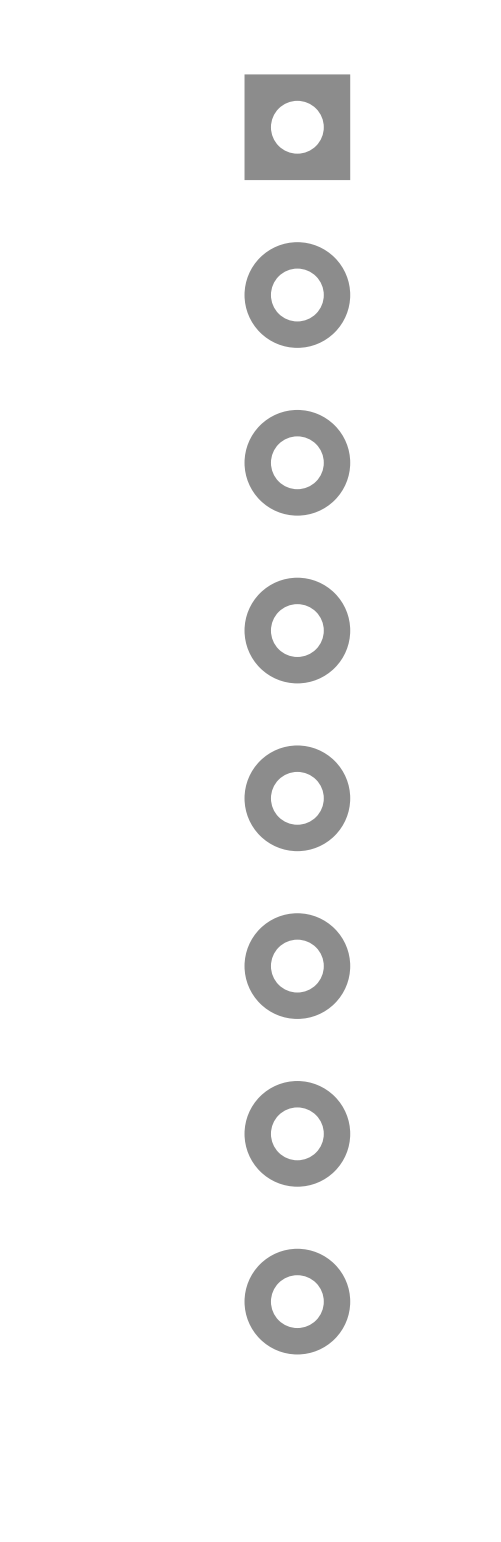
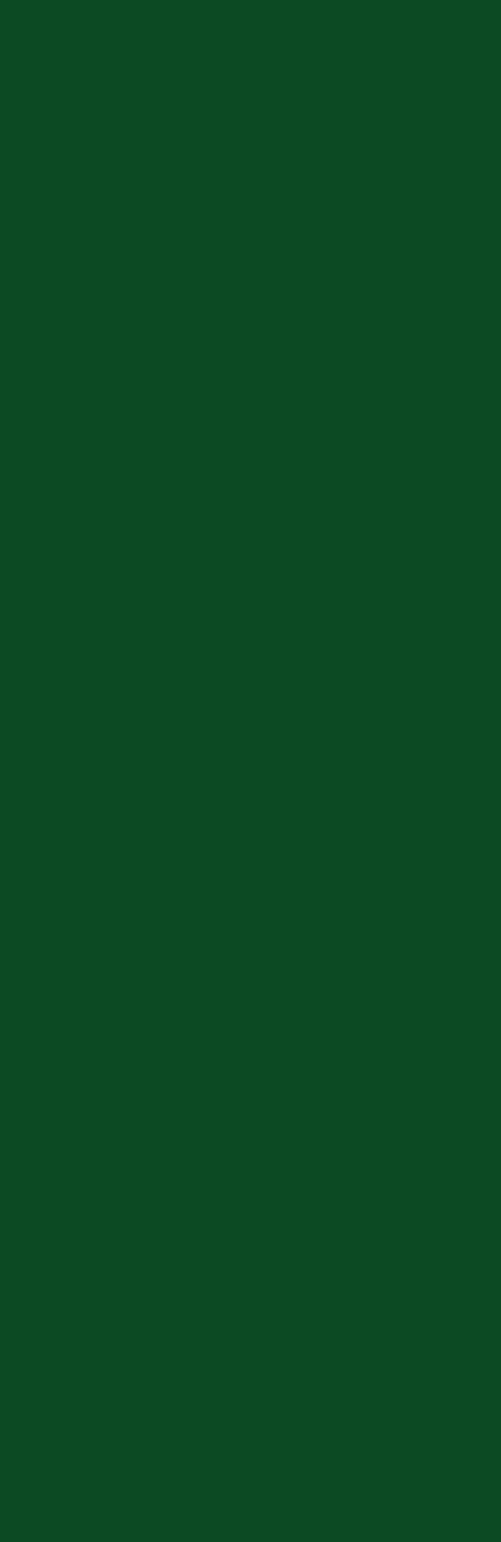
part: (297, 714) -> none

